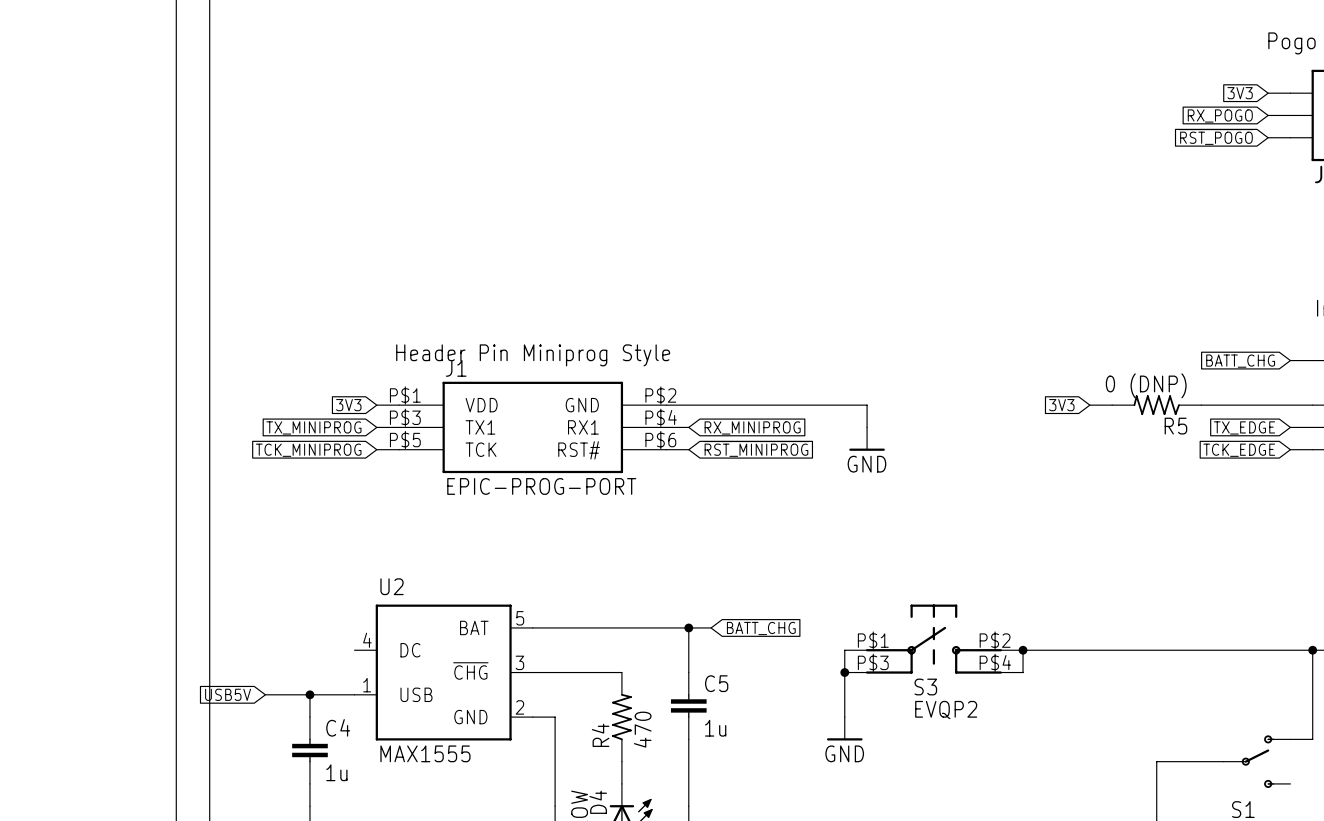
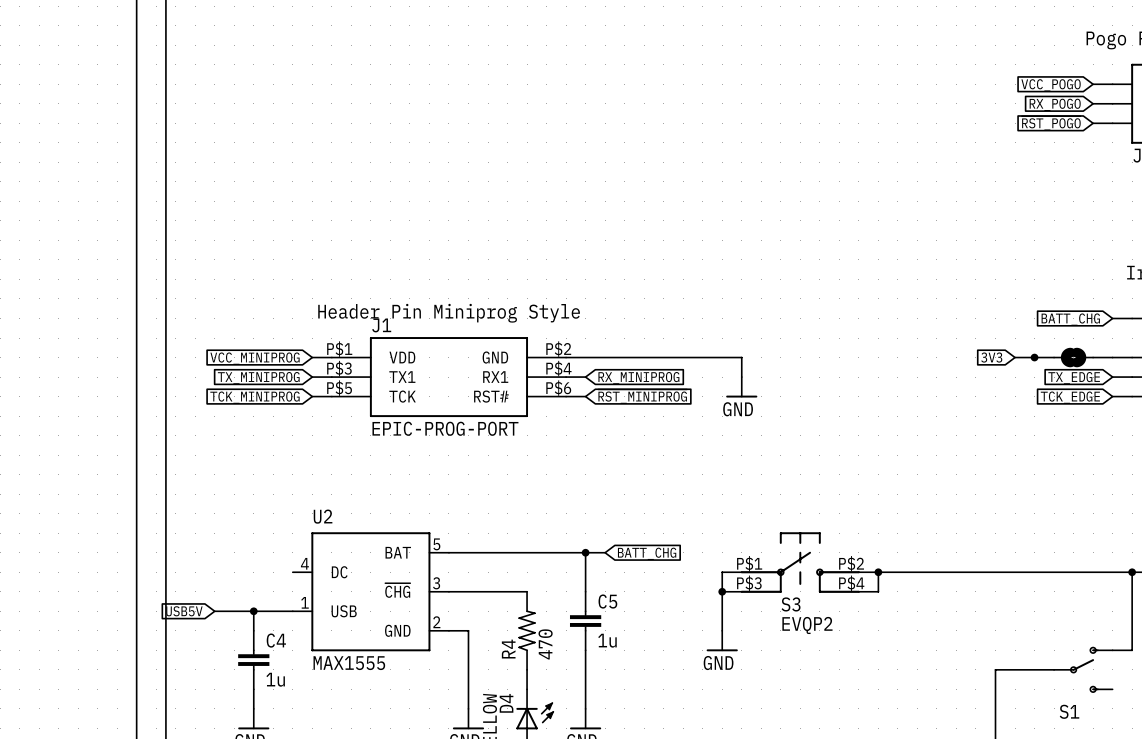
global label: 3V3 (1240, 93) -> VCC_POGO (1051, 85)
global label: 3V3 (348, 405) -> VCC_MINIPROG (255, 358)
global label position: 3V3 (1061, 405) -> 3V3 (991, 357)
wire: (1089, 405) (1112, 405) -> none
R5: 0 (DNP) (1156, 405) -> none
junction: none -> (1034, 357)
part: none -> (1073, 357)

